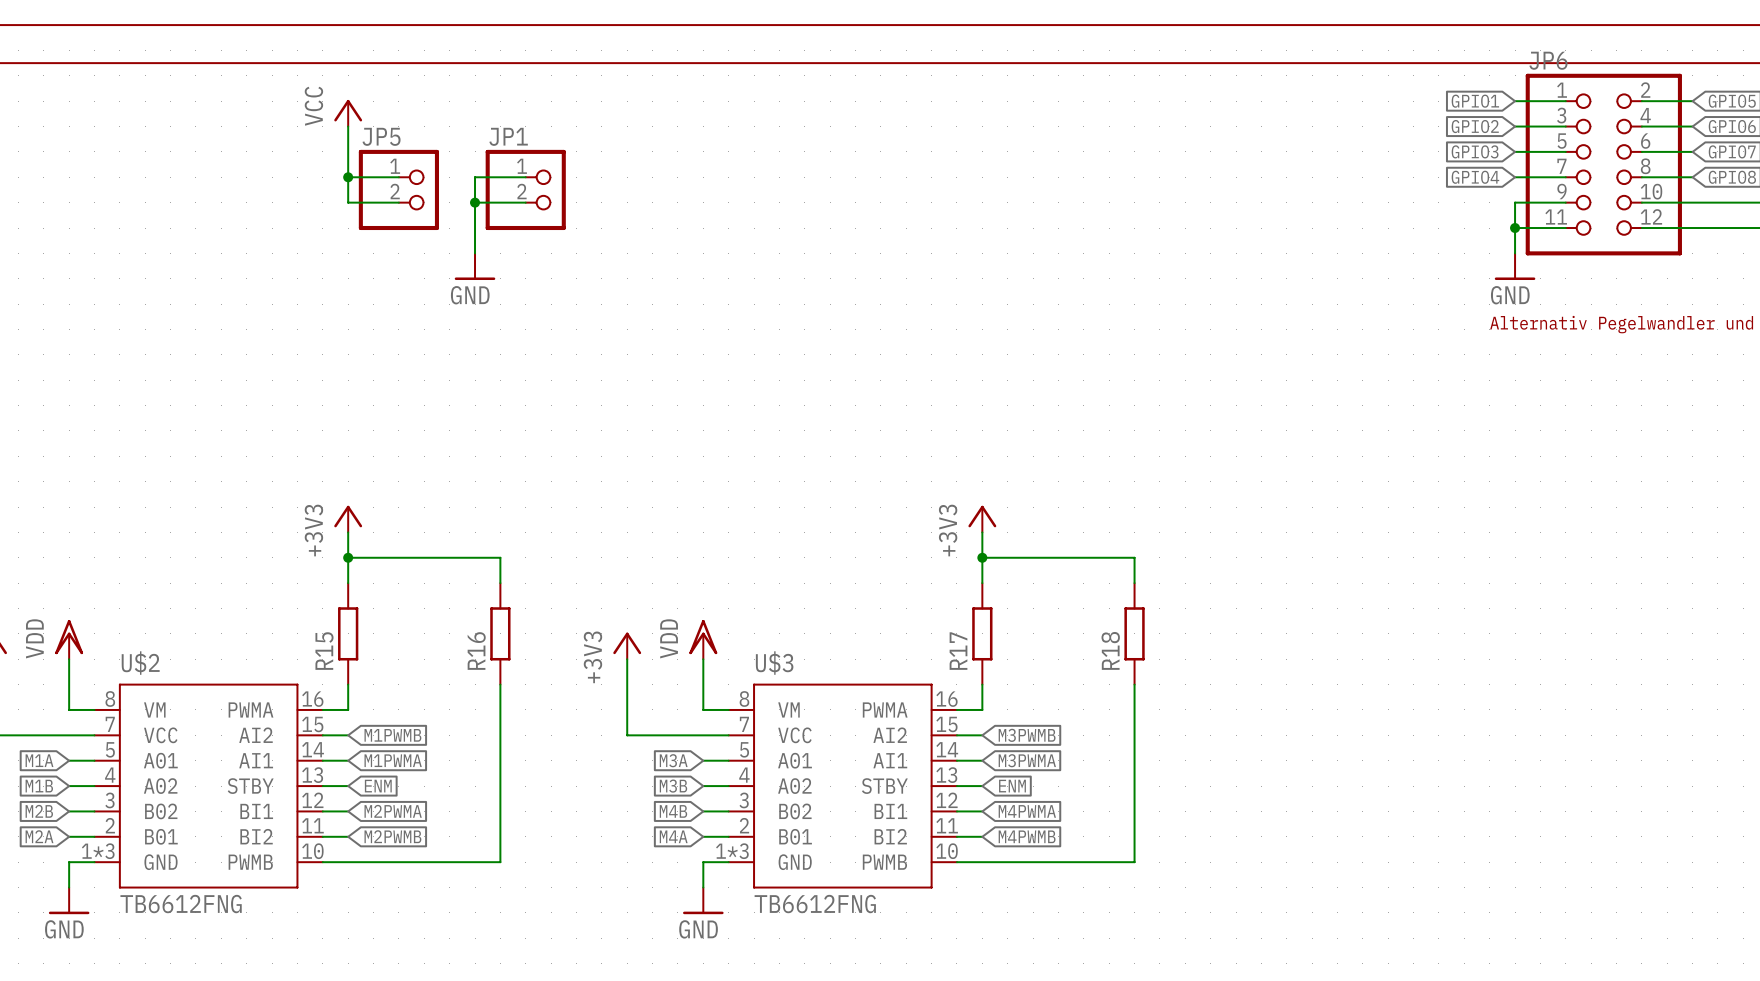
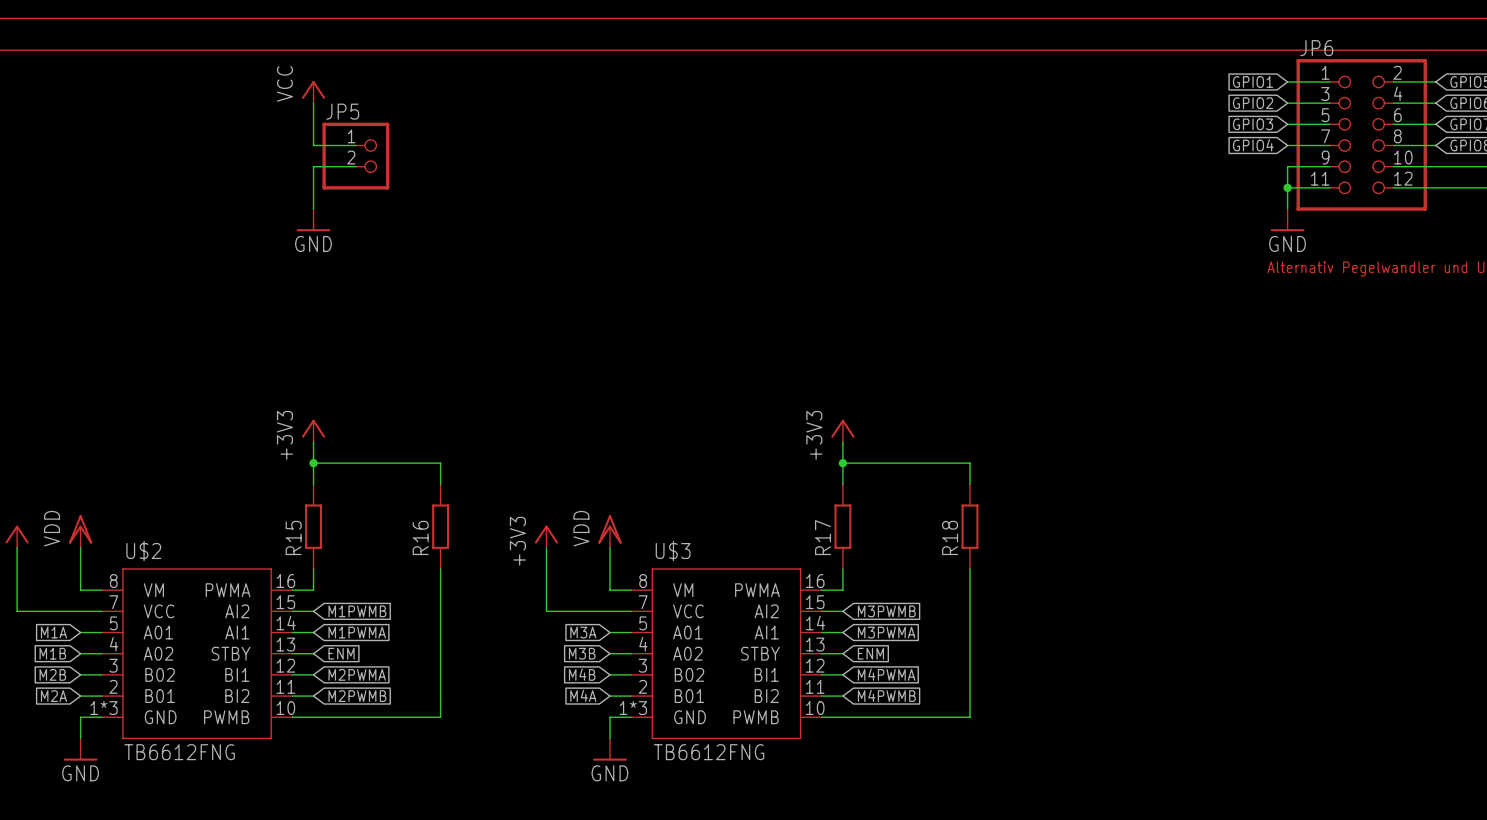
wire: (348, 177) (348, 202) -> (313, 209) (313, 166)
junction: (348, 177) -> none
wire: (525, 177) (475, 177) (475, 253) -> none
JP1: (525, 189) -> none
wire: (475, 202) (525, 202) -> none
junction: (475, 202) -> none
power symbol position: GND (475, 266) -> GND (313, 220)

